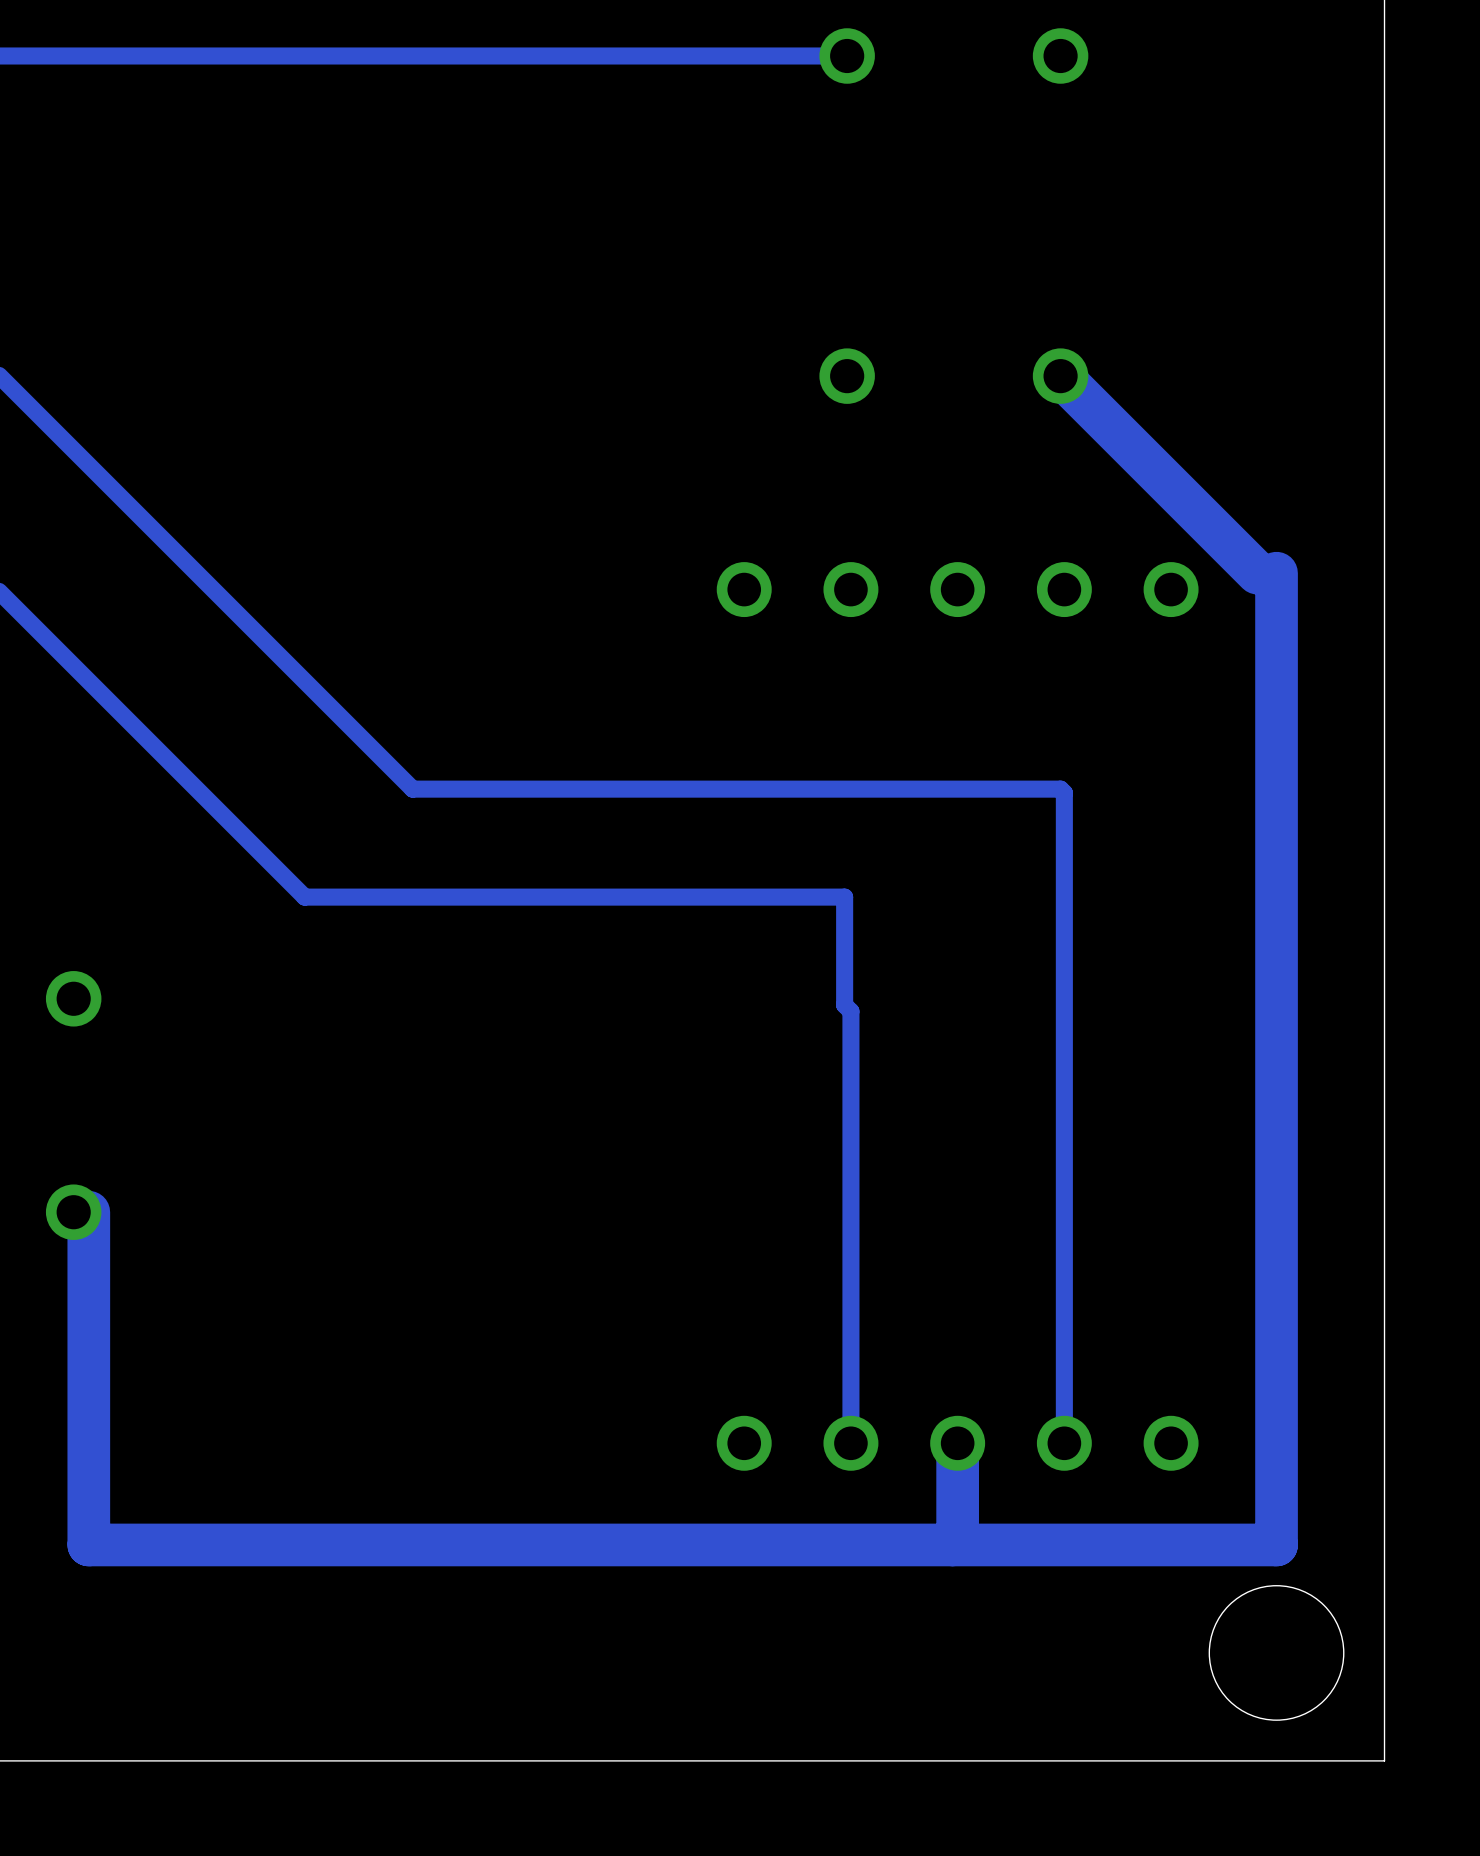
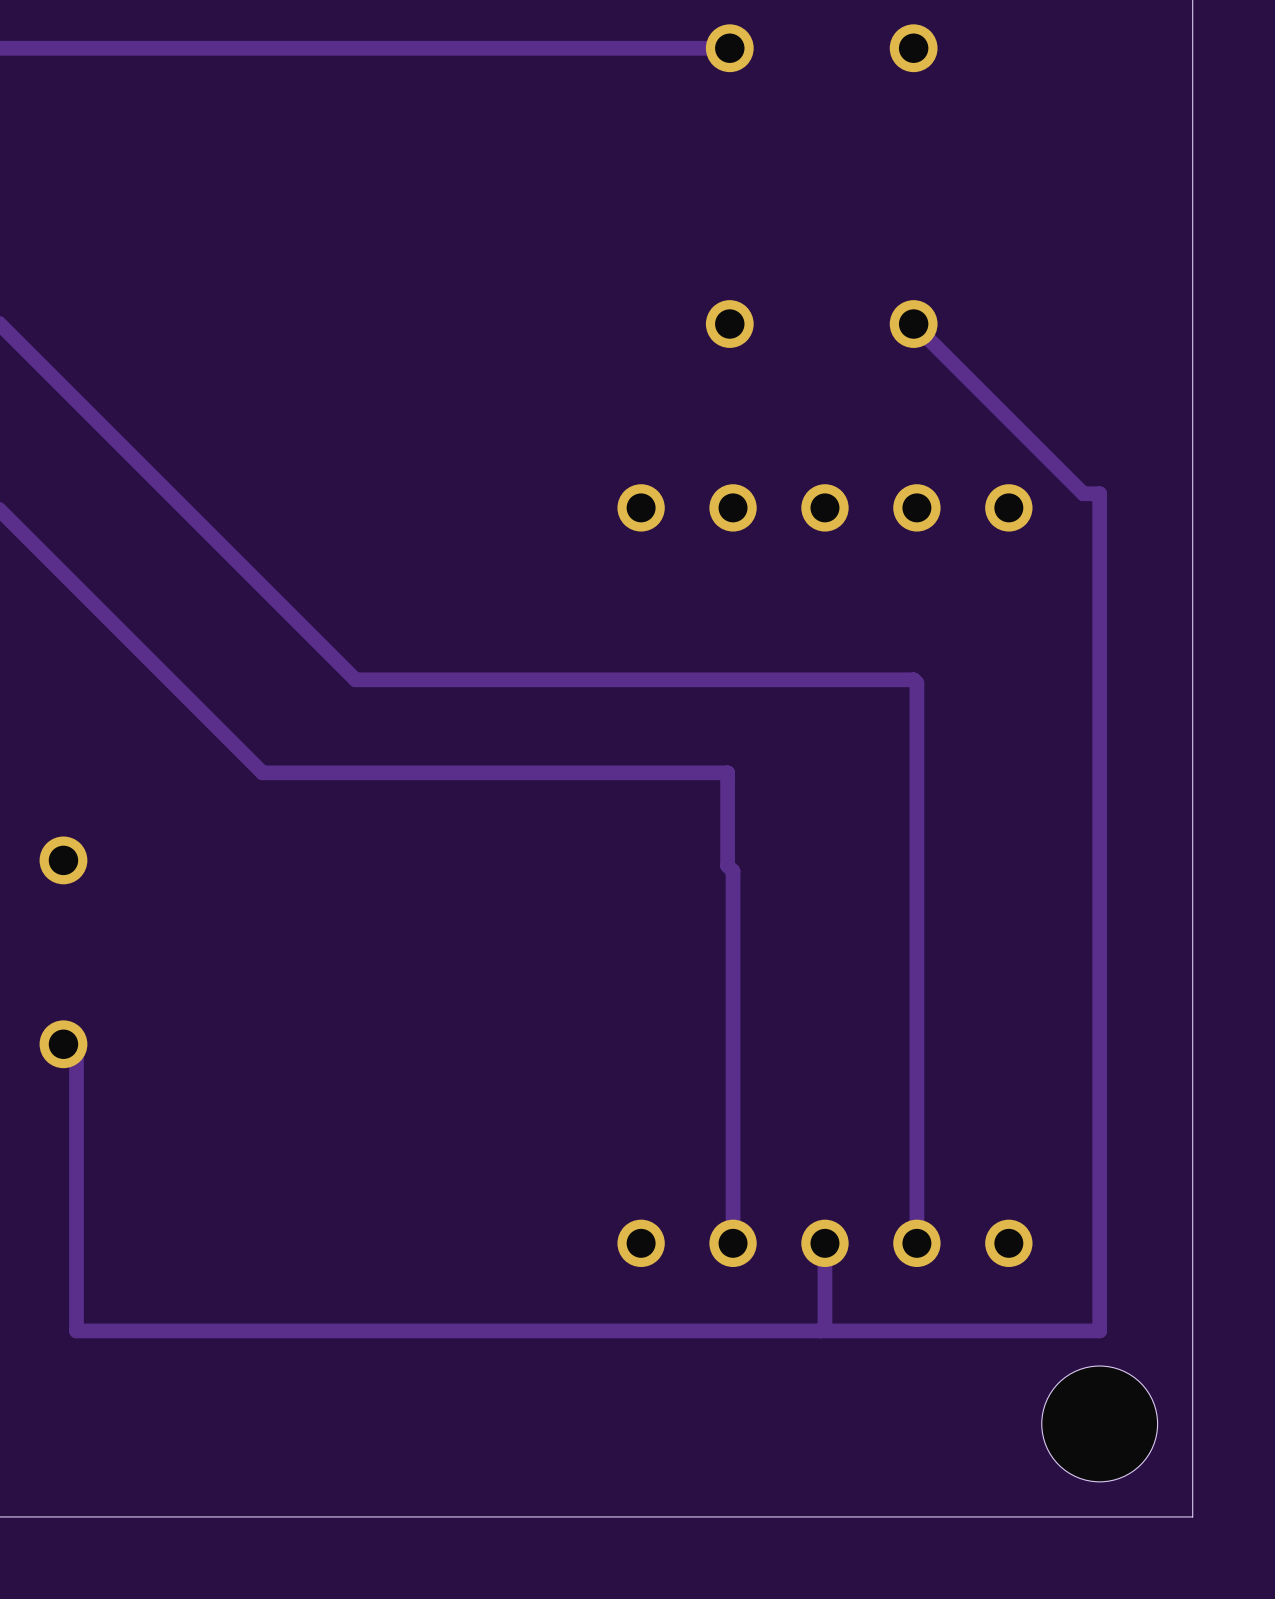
track width: thick (1060, 376) (1257, 573) -> thin (913, 324) (1083, 493)
track width: thick (1276, 573) (1276, 1544) (88, 1544) (88, 1212) -> thin (1099, 493) (1099, 1330) (76, 1330) (76, 1044)
track width: thick (957, 1443) (957, 1539) -> thin (824, 1243) (824, 1326)

